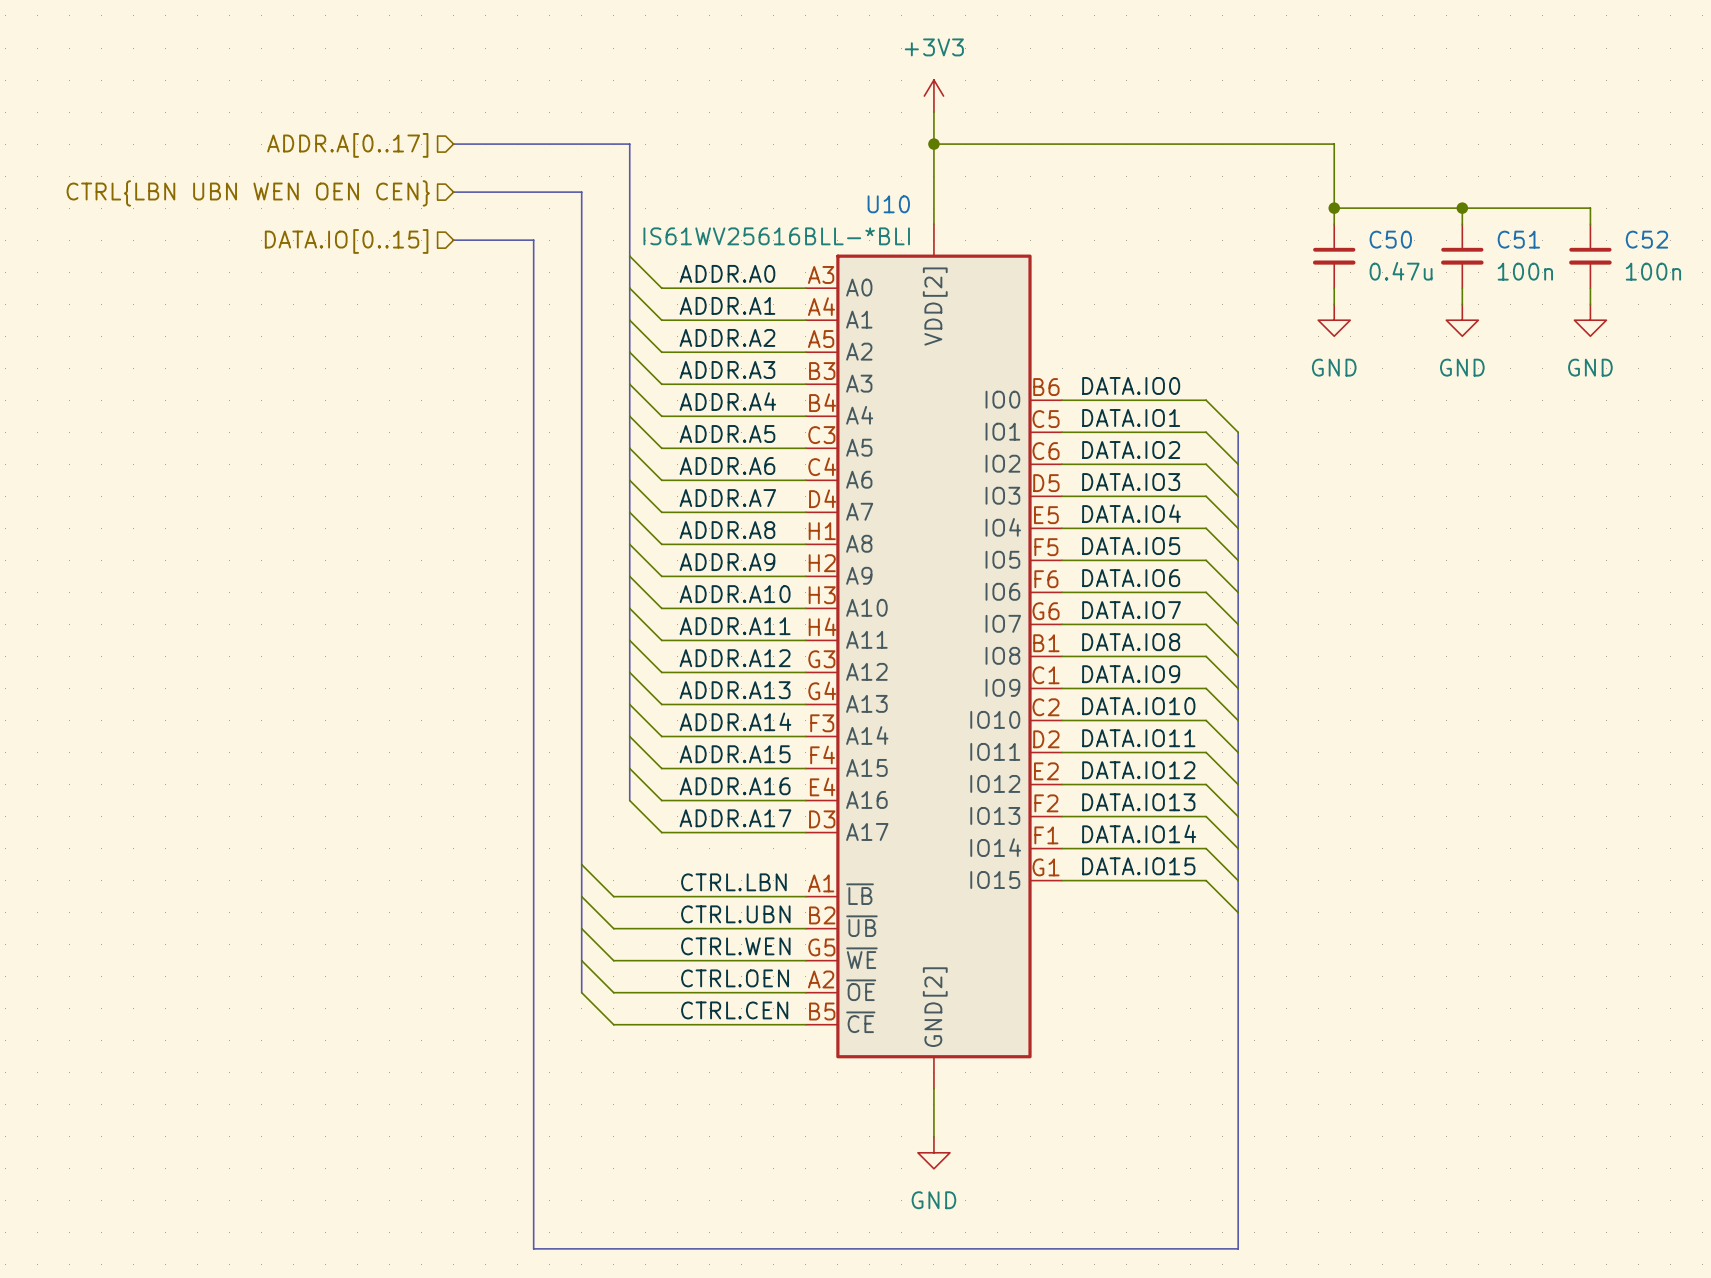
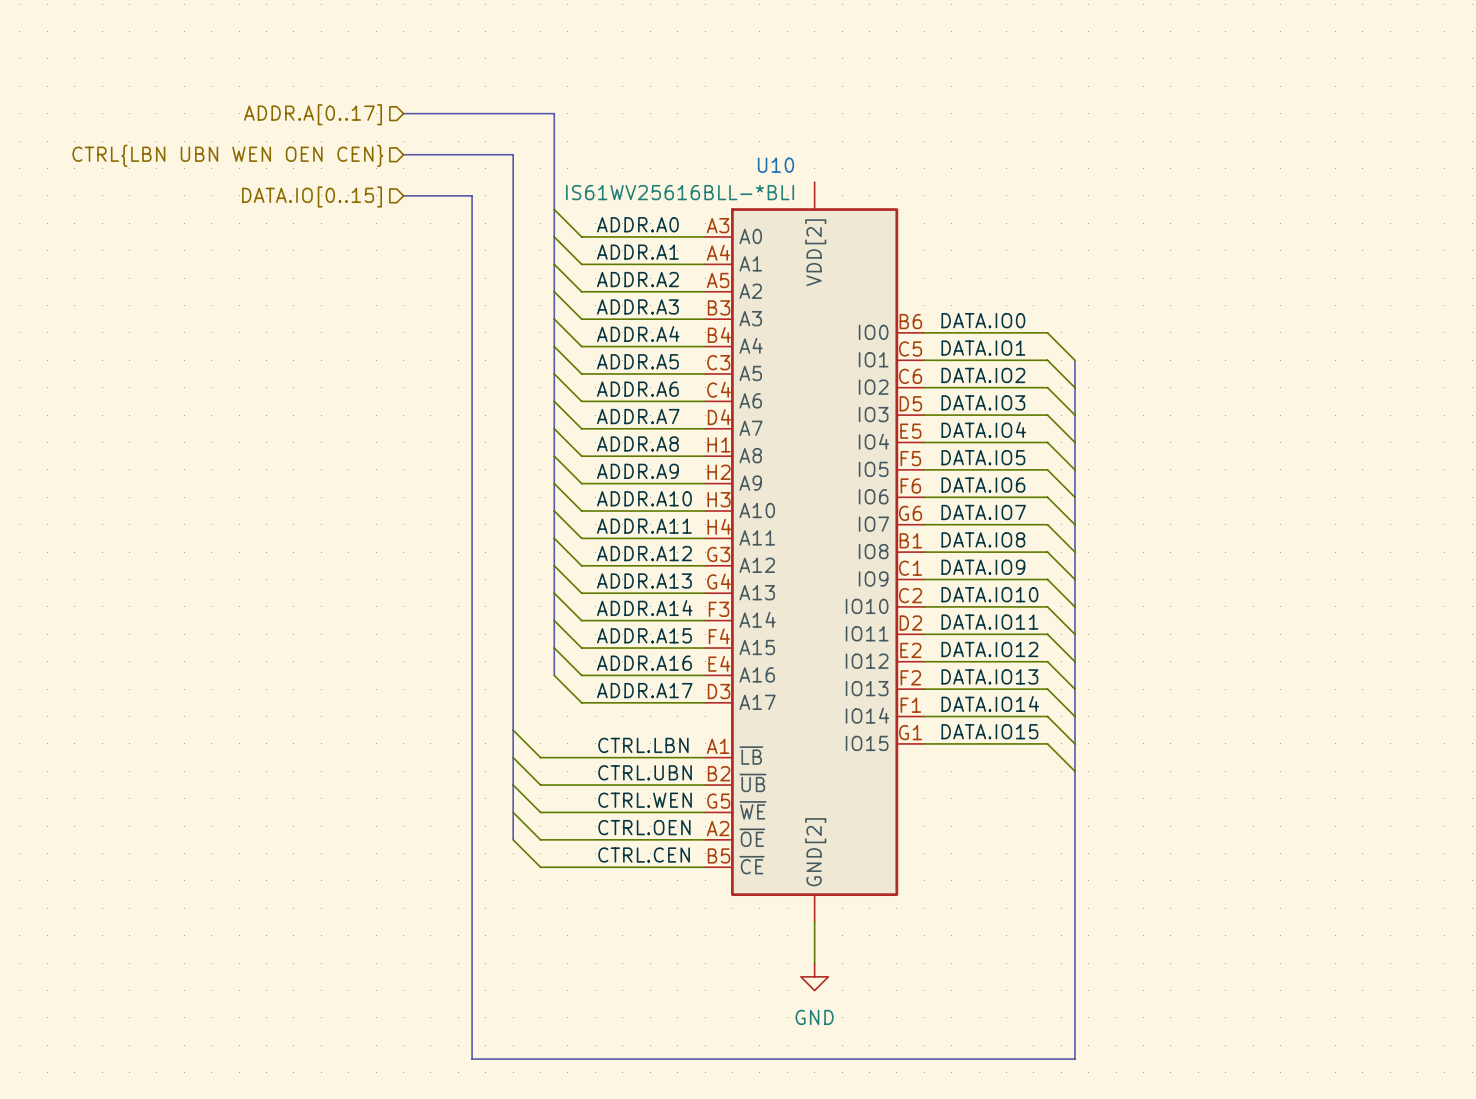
power symbol: +3V3 (933, 96) -> none
wire: (933, 112) (933, 224) -> none
wire: (933, 144) (1334, 144) (1334, 224) -> none
junction: (933, 144) -> none
wire: (1334, 208) (1590, 208) (1590, 224) -> none
junction: (1334, 208) -> none
wire: (1462, 208) (1462, 224) -> none
junction: (1462, 208) -> none
C50: 0.47u (1334, 256) -> none
C51: 100n (1462, 256) -> none
C52: 100n (1590, 256) -> none
wire: (1334, 288) (1334, 304) -> none
wire: (1462, 288) (1462, 304) -> none
wire: (1590, 288) (1590, 304) -> none
power symbol: GND (1334, 320) -> none
power symbol: GND (1462, 320) -> none
power symbol: GND (1590, 320) -> none

